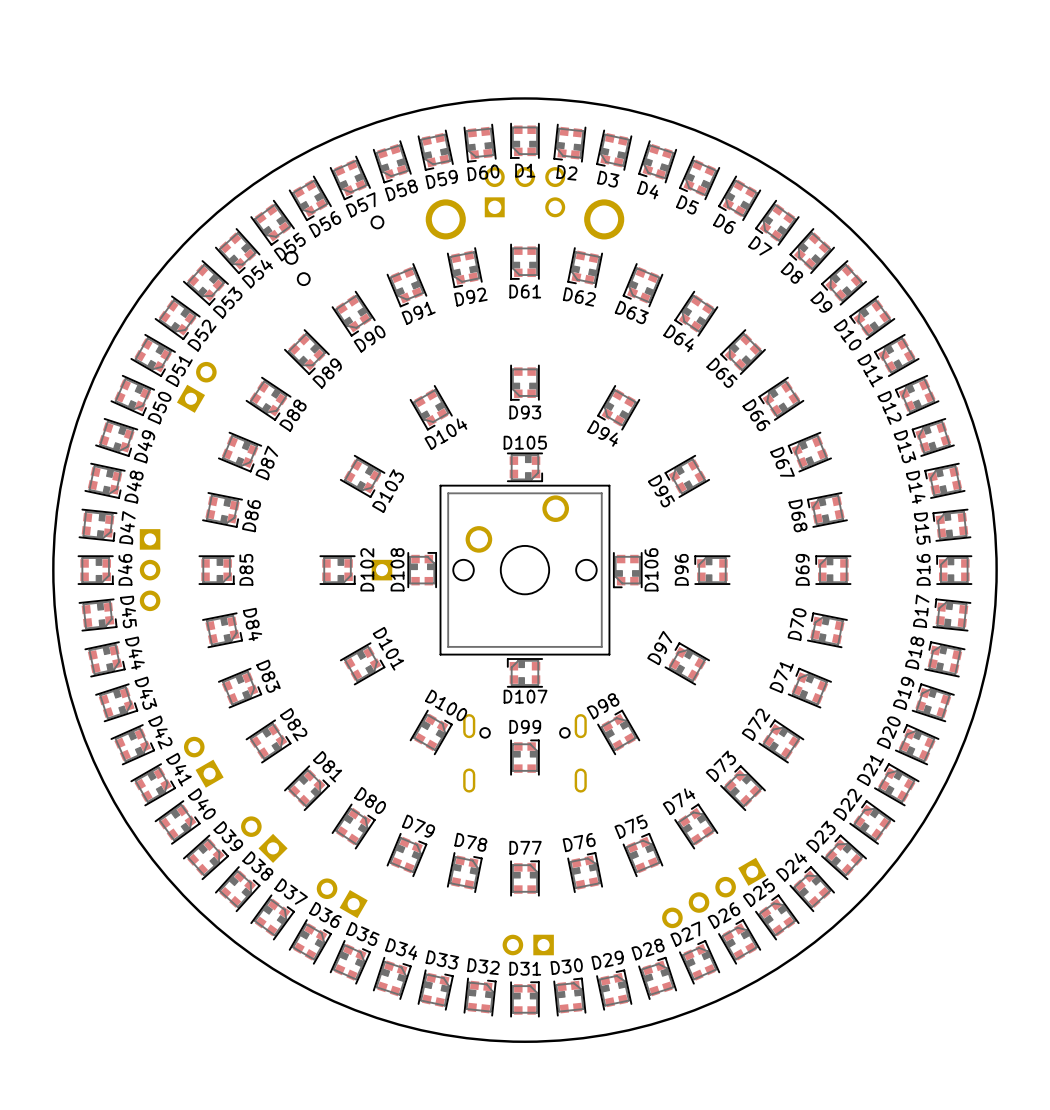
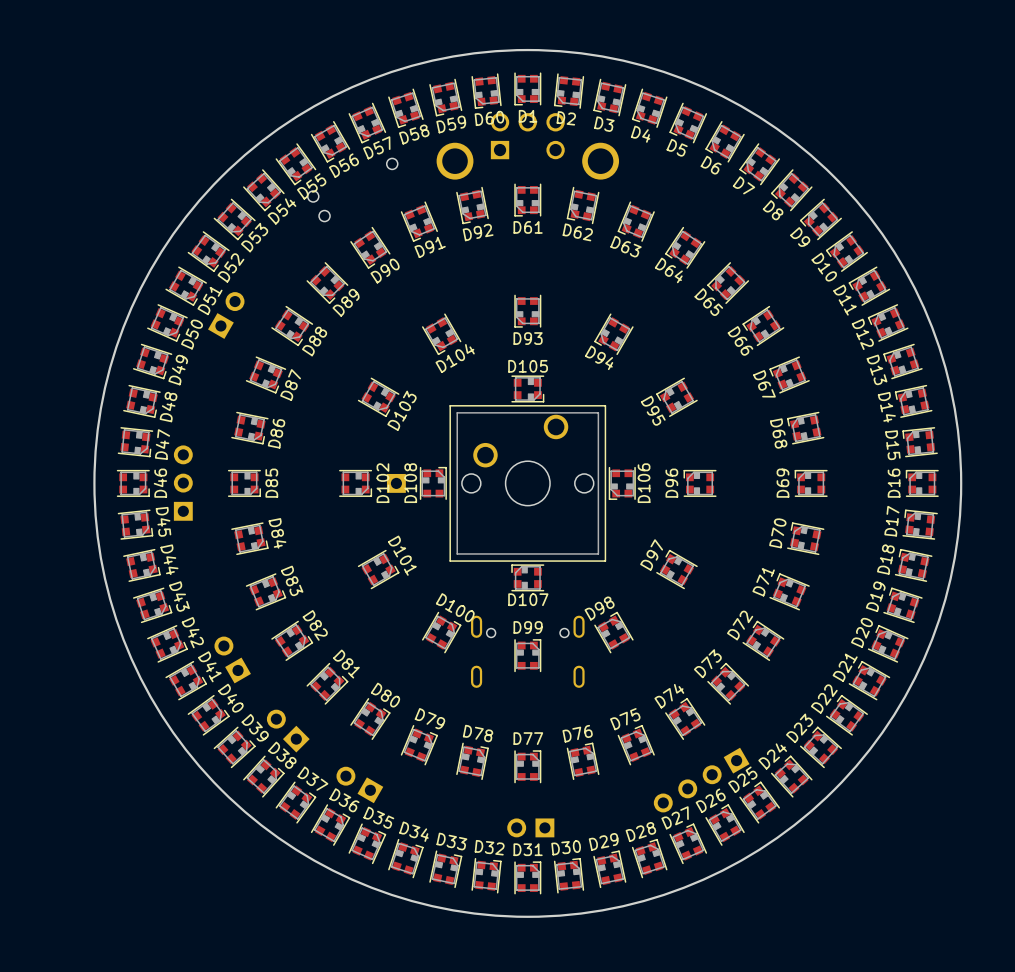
part rotation: 0° (150, 570) -> 180° (183, 483)

